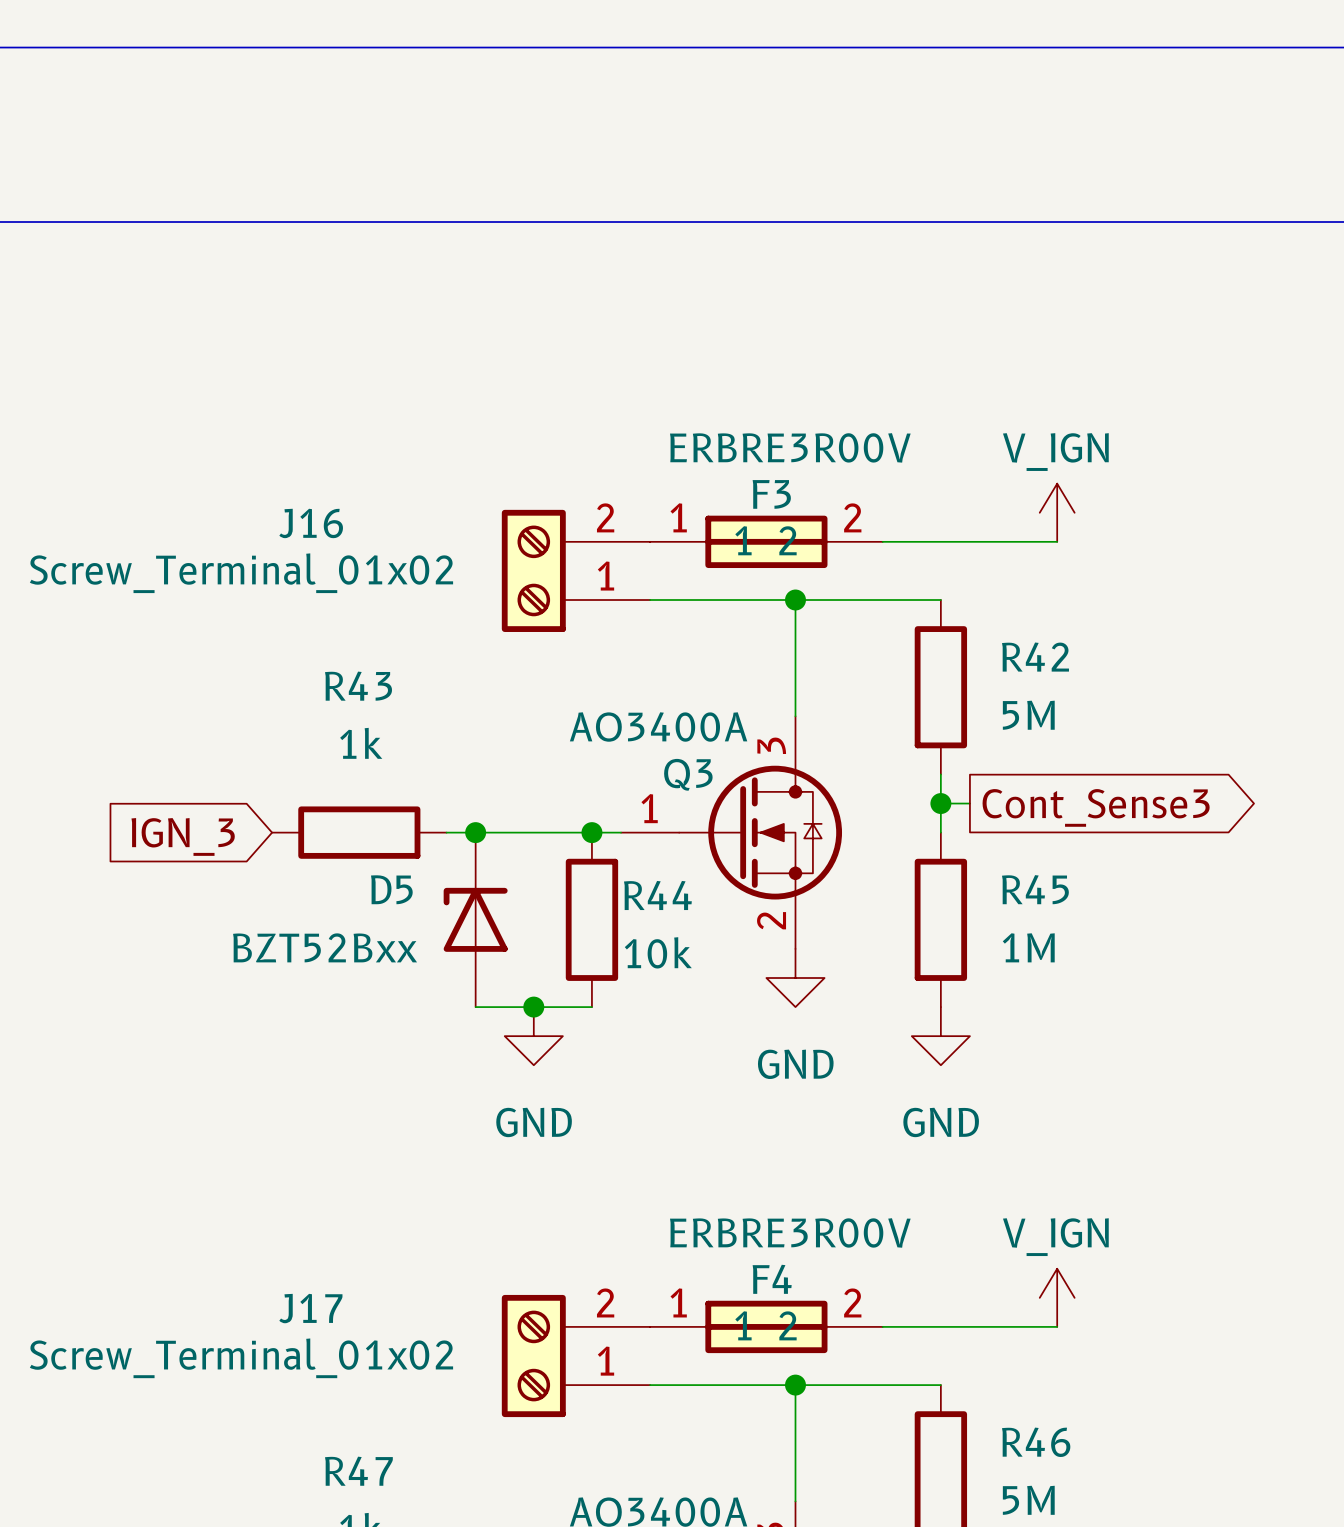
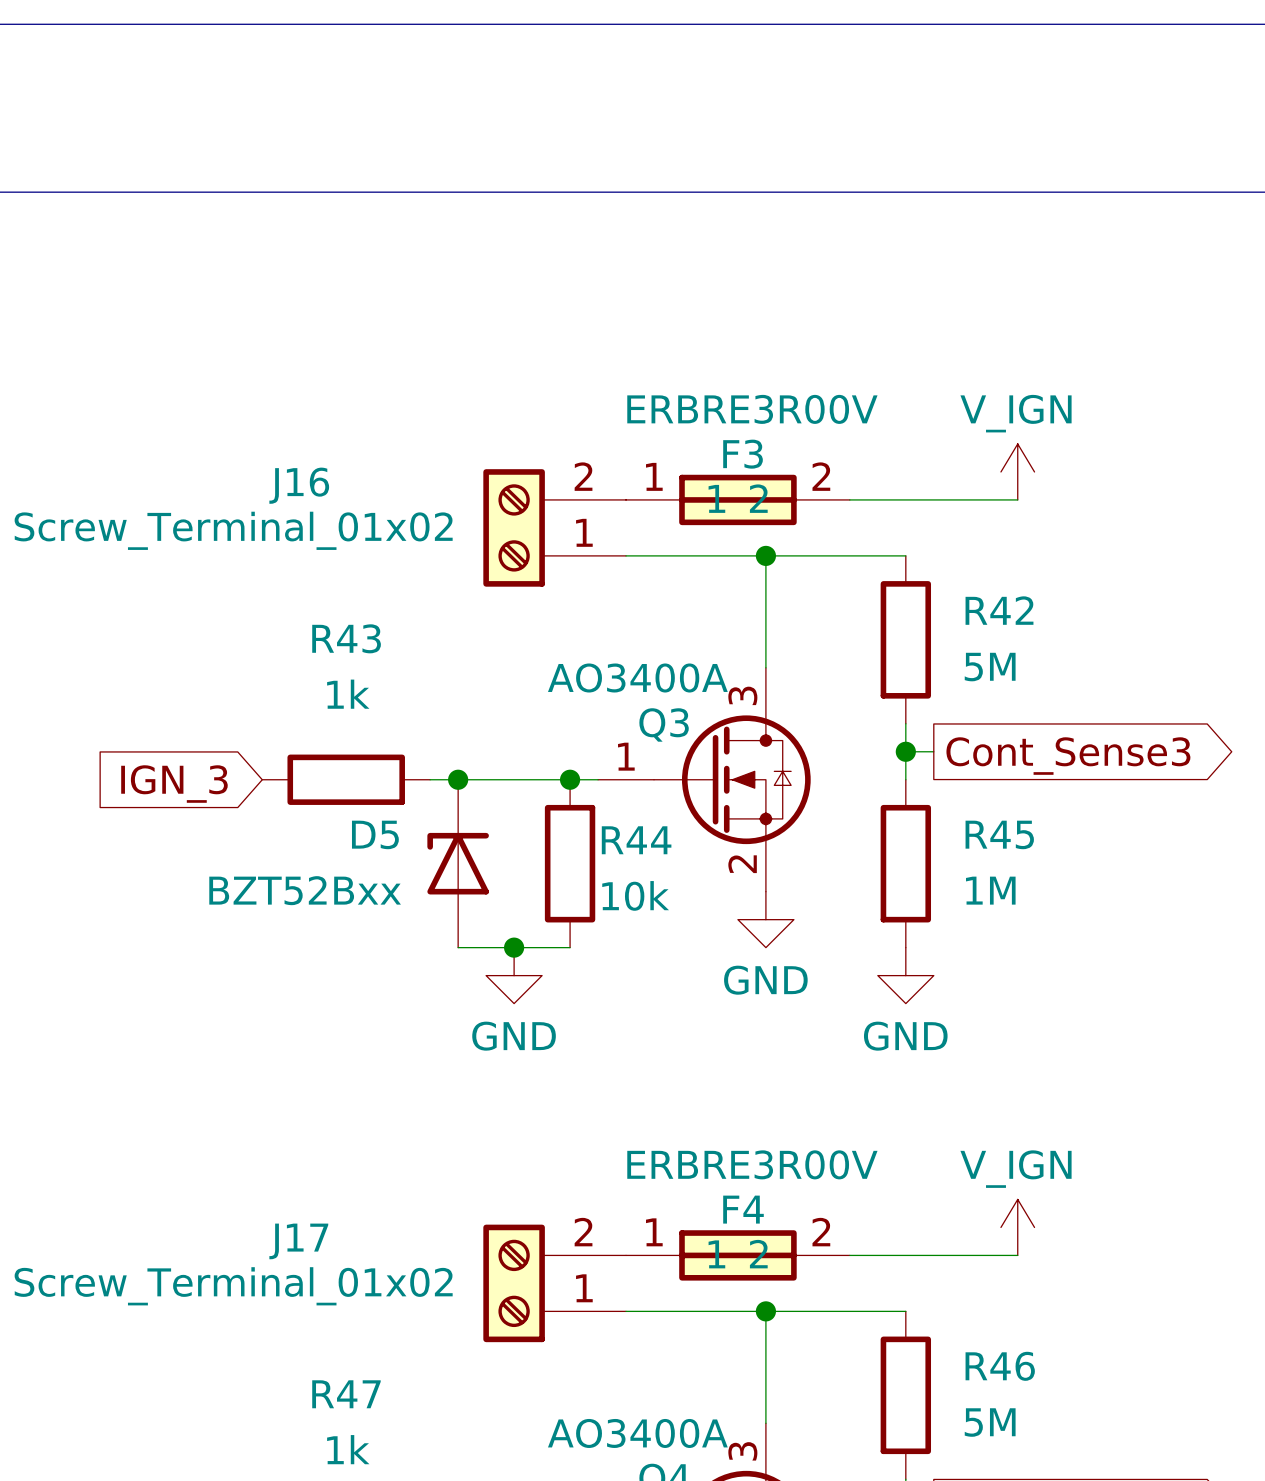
power symbol text position: GND (795, 1064) -> GND (765, 980)
power symbol text position: GND (534, 1122) -> GND (514, 1036)
power symbol text position: GND (941, 1122) -> GND (905, 1036)

